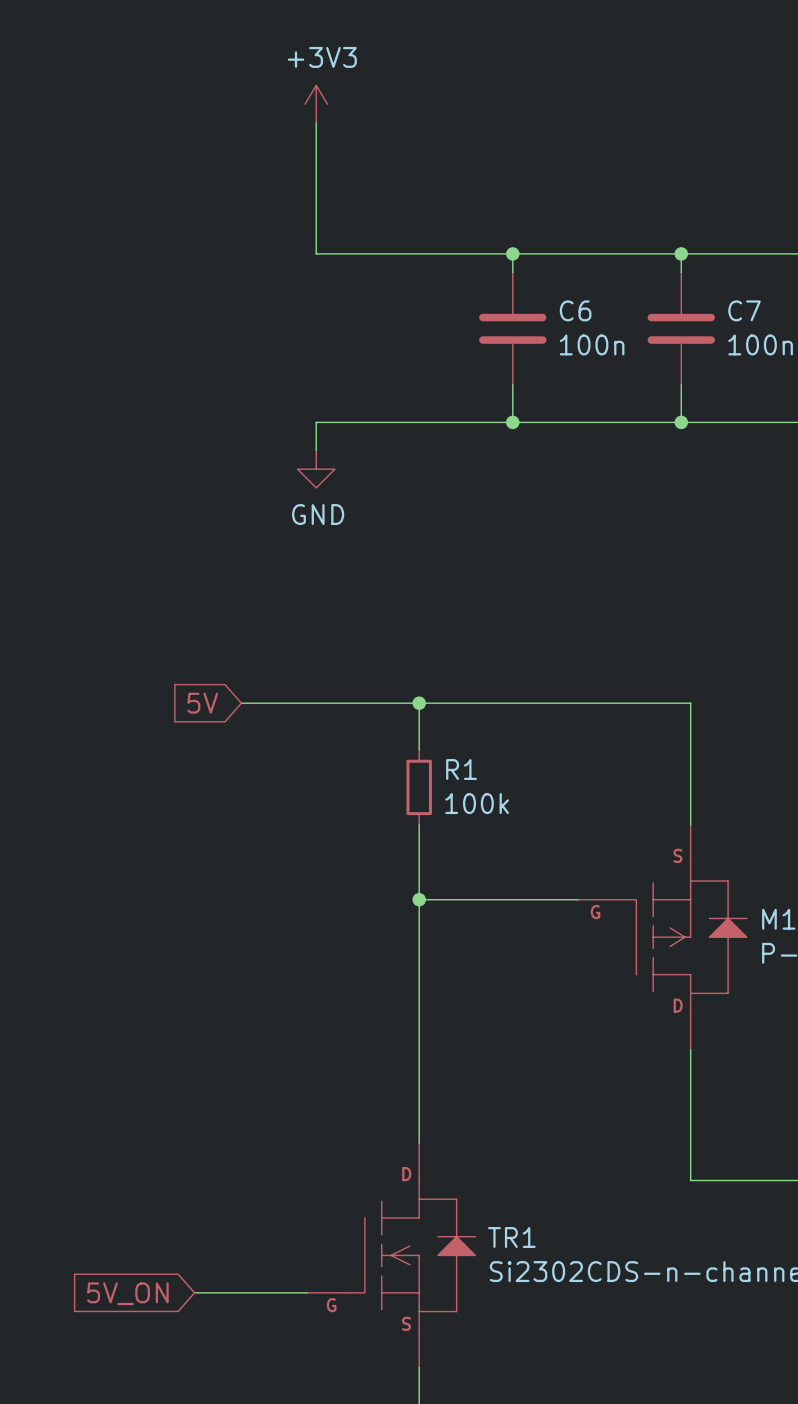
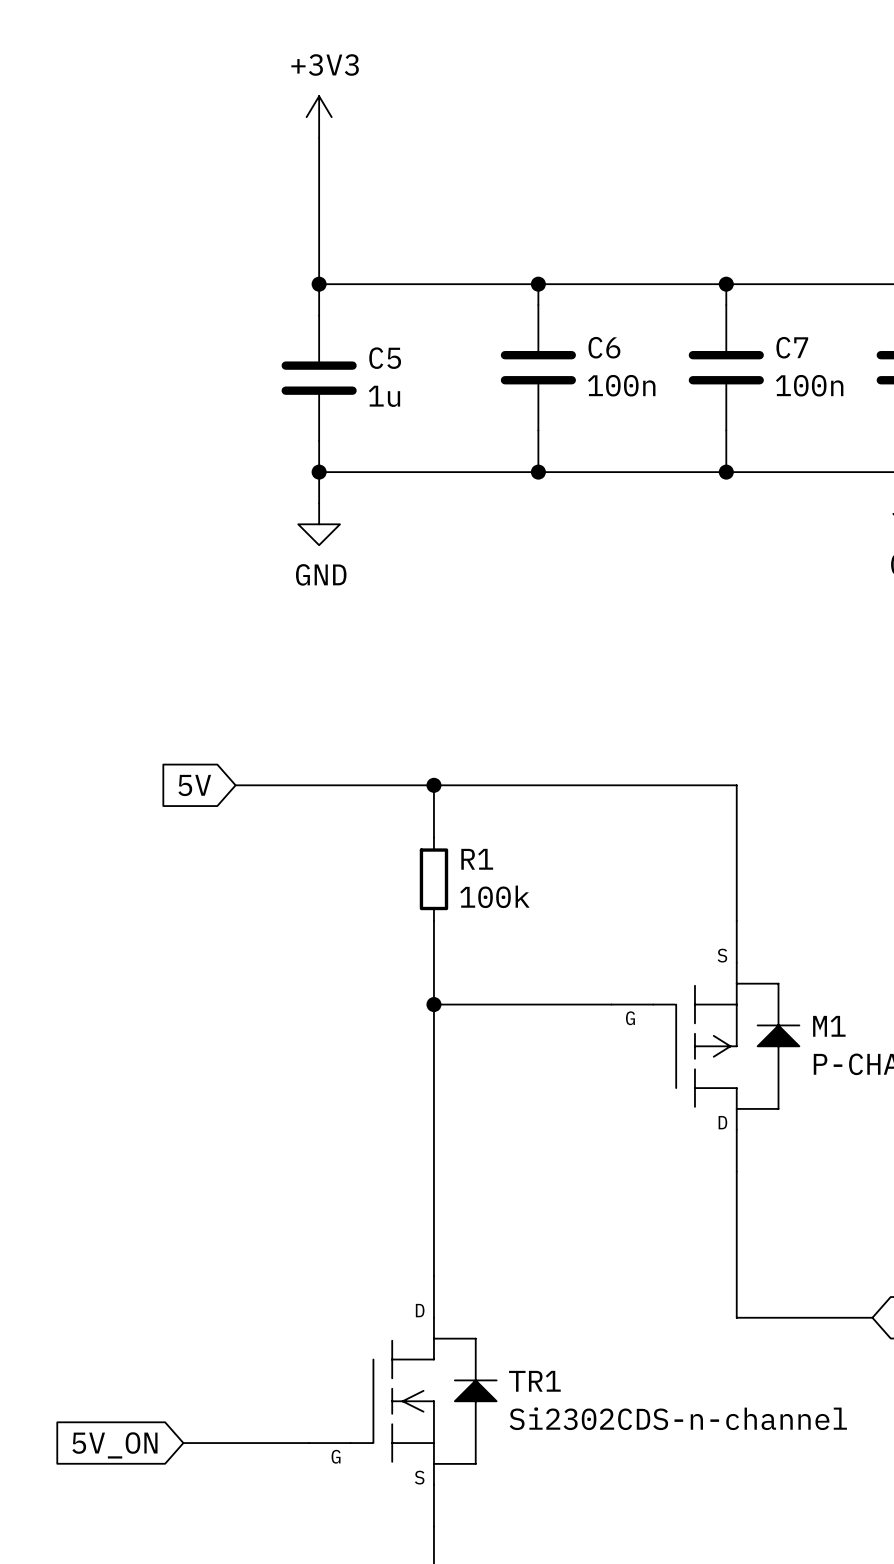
wire: none -> (319, 284) (319, 315)
junction: none -> (319, 284)
C5: none -> 1u (319, 378)
wire: none -> (319, 440) (319, 472)
junction: none -> (319, 472)

